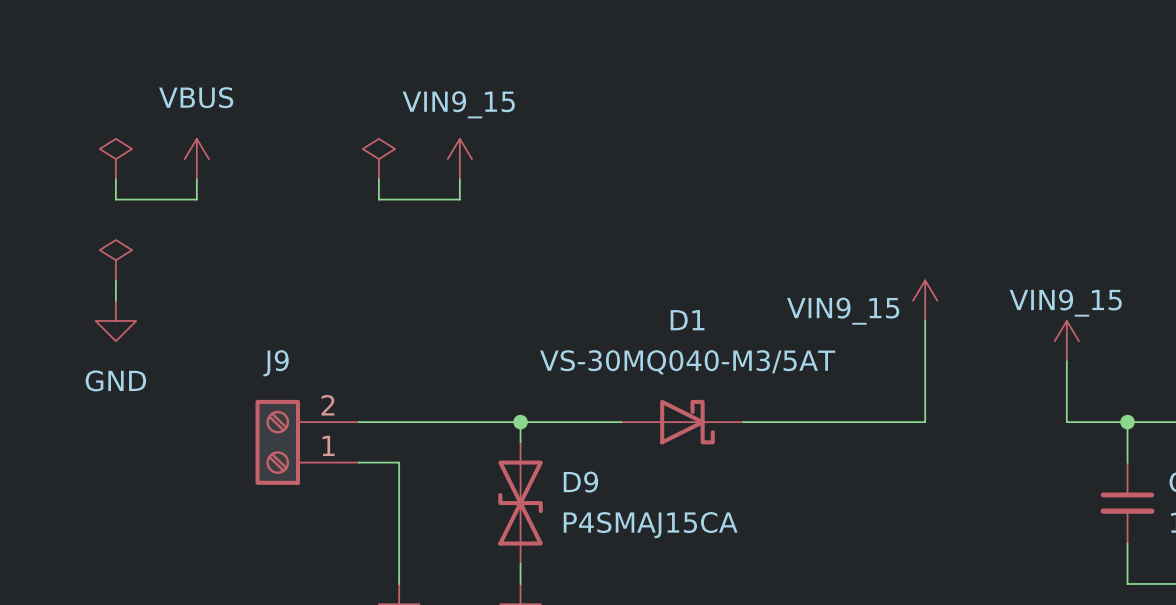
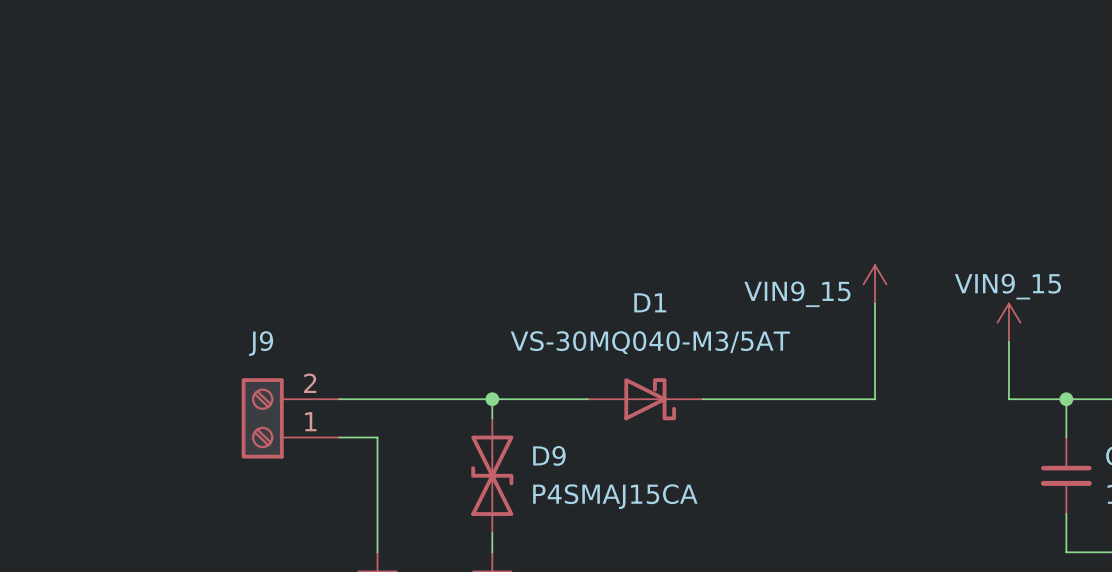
power symbol: (115, 159) -> none
power symbol: VBUS (196, 159) -> none
power symbol: (378, 159) -> none
power symbol: VIN9_15 (459, 159) -> none
wire: (115, 179) (115, 199) (196, 199) (196, 179) -> none
wire: (378, 179) (378, 199) (459, 199) (459, 179) -> none
power symbol: (115, 260) -> none
wire: (115, 280) (115, 300) -> none
power symbol: GND (115, 320) -> none

